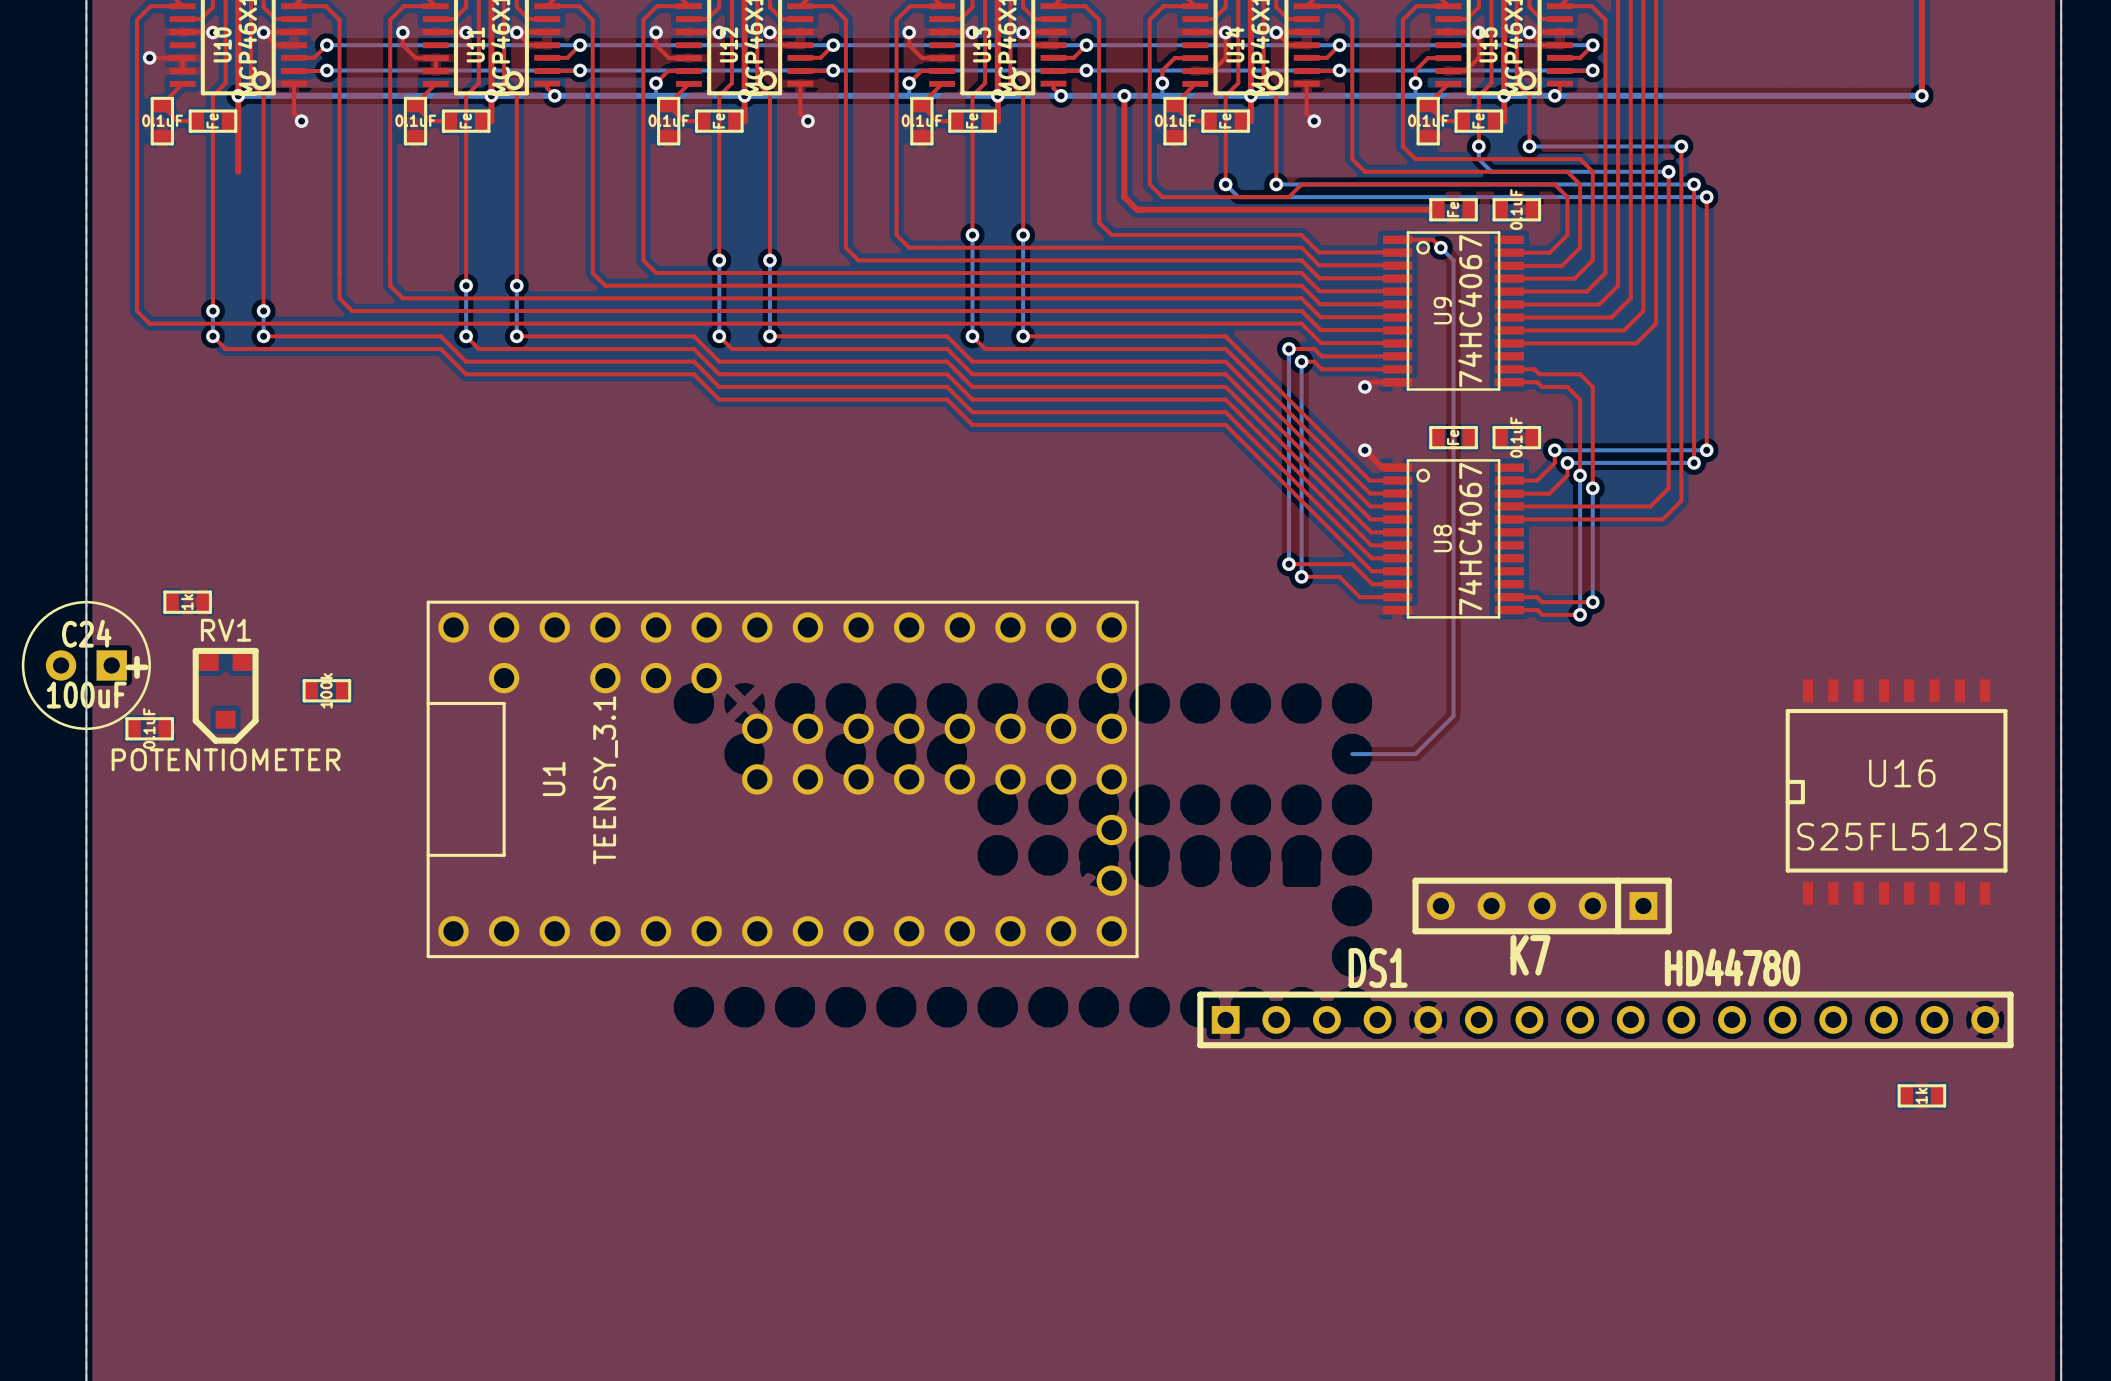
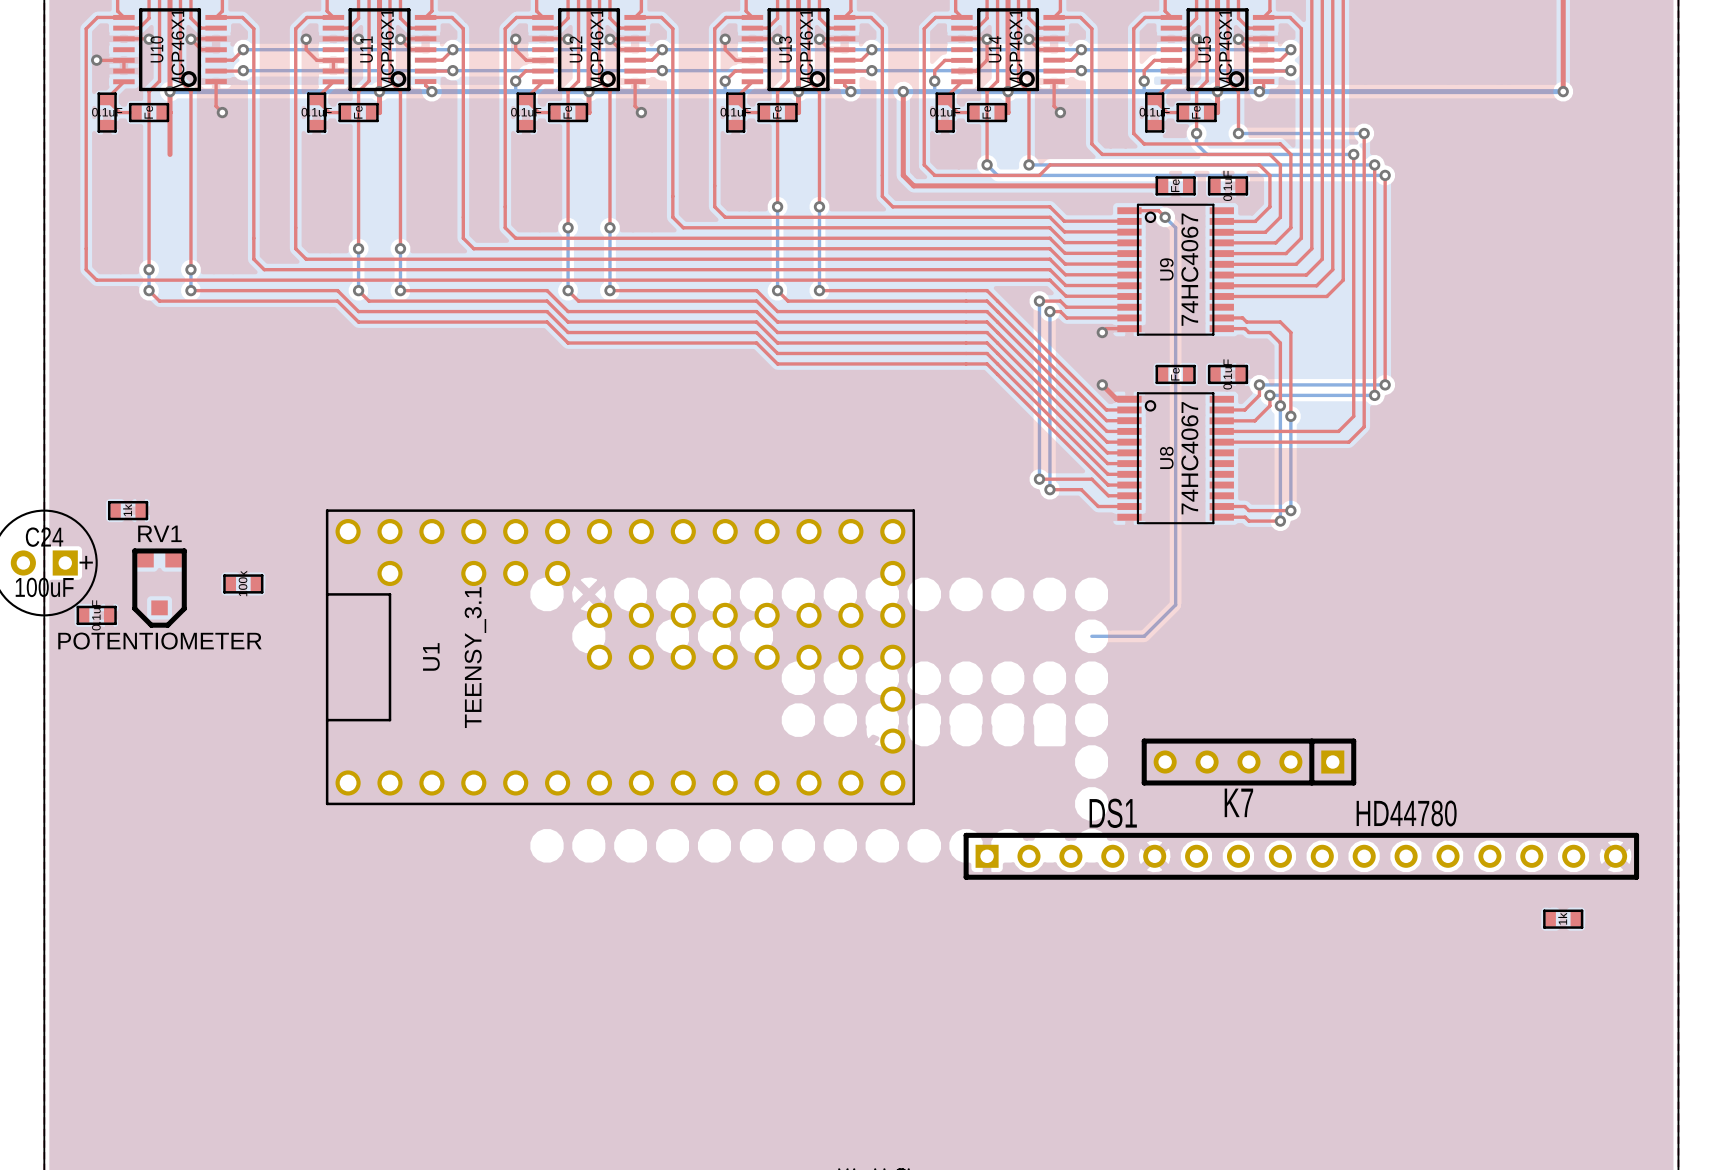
U16: S25FL512S (1896, 792) -> none

